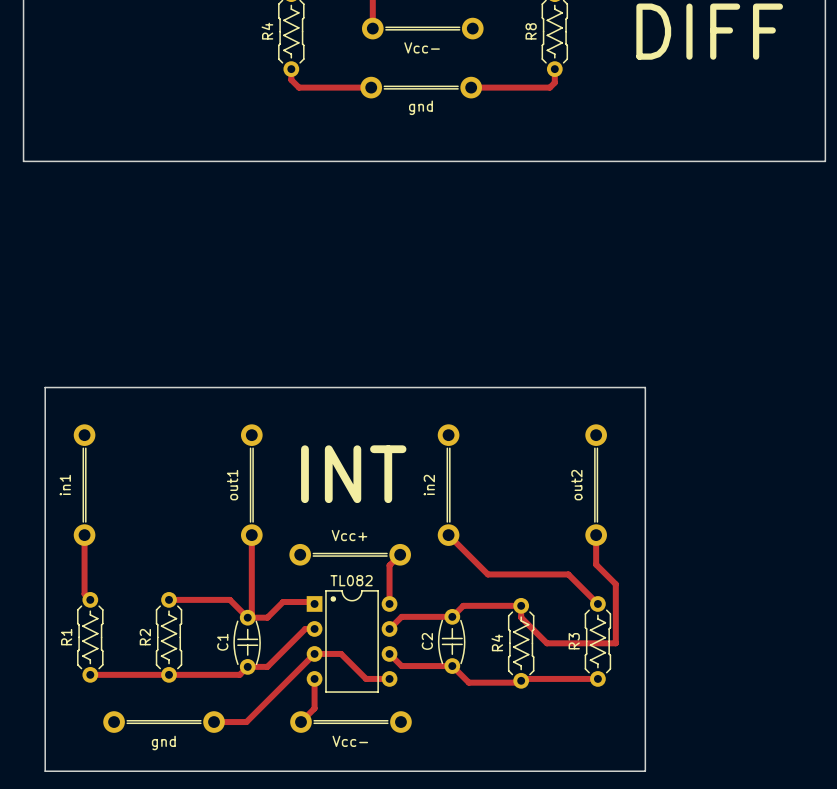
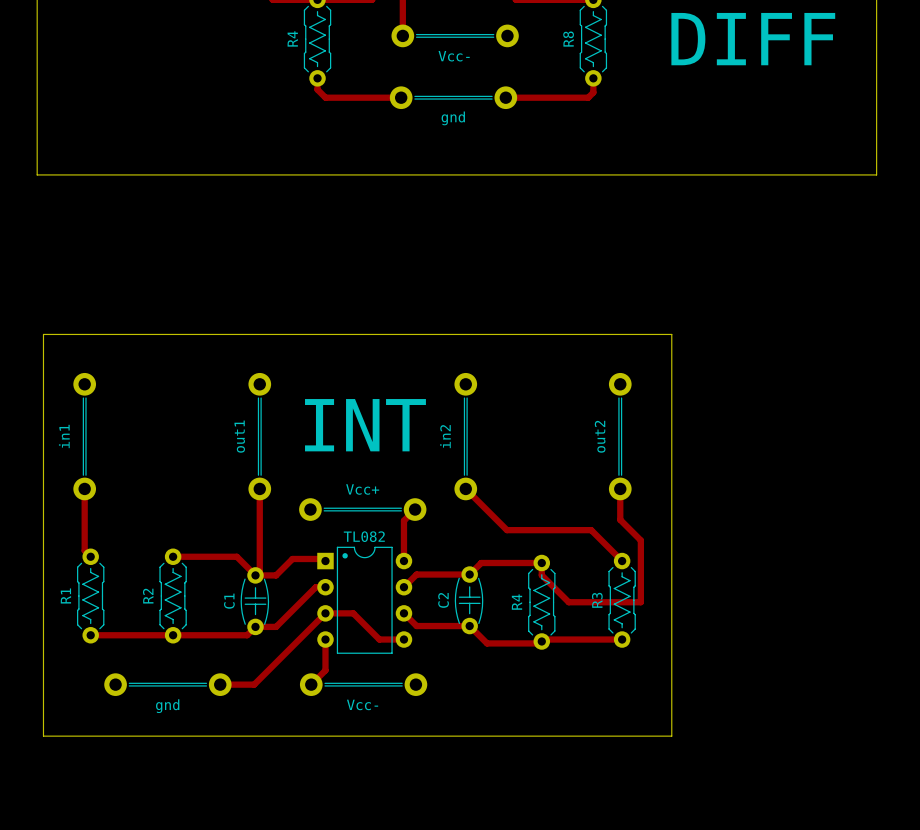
board edge: (45, 387) (645, 387) (645, 771) (45, 771) (45, 387) -> (43, 334) (671, 334) (671, 736) (43, 736) (43, 334)
text position: INT (353, 474) -> INT (365, 425)
in1 position: (84, 485) -> (84, 436)
out1 position: (251, 485) -> (259, 436)
in2 position: (448, 485) -> (465, 436)
out2 position: (596, 485) -> (620, 436)
top track: (84, 535) (84, 594) (90, 599) -> (84, 488) (84, 550) (90, 556)
top track: (251, 535) (251, 613) (247, 617) -> (259, 488) (259, 571) (255, 575)
top track: (448, 535) (487, 574) (568, 574) (597, 603) -> (465, 488) (506, 530) (591, 530) (622, 561)
top track: (596, 535) (596, 564) (615, 584) (615, 643) (546, 643) (521, 617) (521, 605) (463, 605) (452, 616) (401, 616) (389, 628) -> (620, 488) (620, 519) (640, 540) (640, 602) (568, 602) (541, 575) (541, 563) (481, 563) (469, 574) (416, 574) (403, 587)
Vcc+ position: (350, 554) -> (362, 509)
top track: (400, 554) (389, 565) (389, 603) -> (415, 509) (403, 520) (404, 561)
top track: (169, 599) (229, 599) (247, 617) -> (173, 556) (236, 556) (255, 575)
top track: (314, 603) (312, 602) (283, 602) (267, 617) (247, 617) -> (325, 561) (323, 558) (292, 558) (276, 575) (255, 575)
top track: (310, 633) (314, 628) (305, 628) (267, 666) (247, 666) (239, 674) (90, 674) -> (320, 591) (325, 587) (315, 587) (276, 626) (255, 626) (247, 635) (90, 635)
R1 position: (90, 637) -> (90, 596)
R2 position: (169, 637) -> (173, 596)
TL082 position: (352, 641) -> (364, 600)
C2 position: (451, 641) -> (469, 600)
R3 position: (597, 641) -> (622, 600)
C1 position: (247, 642) -> (254, 601)
R4 position: (521, 643) -> (541, 602)
top track: (389, 653) (401, 666) (452, 666) (468, 682) (519, 682) (523, 678) (590, 678) -> (403, 613) (416, 626) (469, 626) (487, 643) (539, 643) (543, 639) (613, 639)
top track: (314, 678) (314, 708) (301, 722) -> (325, 639) (325, 670) (311, 684)
top track: (389, 678) (366, 678) (341, 653) (314, 653) (246, 722) (214, 722) -> (403, 639) (379, 639) (353, 613) (325, 613) (254, 684) (220, 684)
gnd position: (164, 722) -> (167, 684)
Vcc- position: (350, 722) -> (363, 684)

